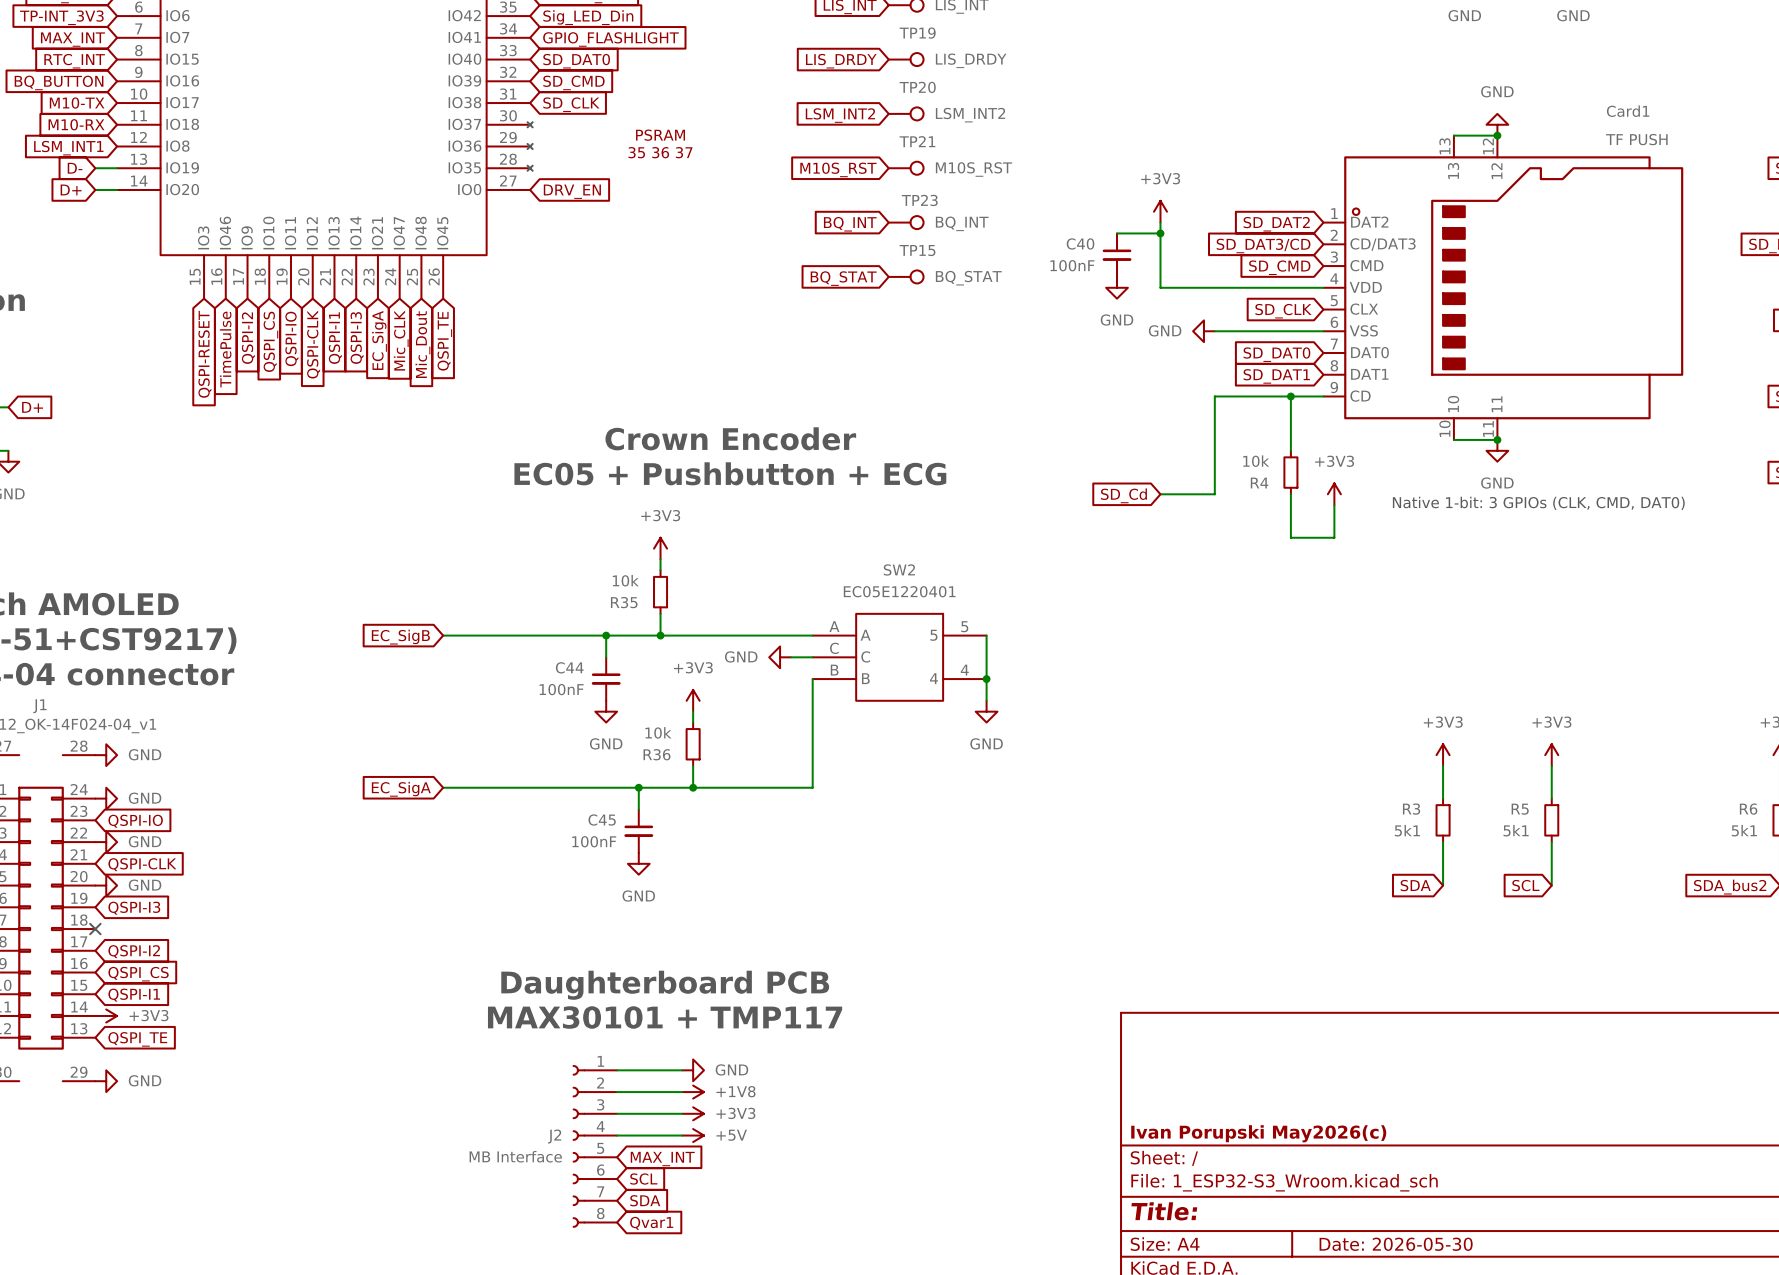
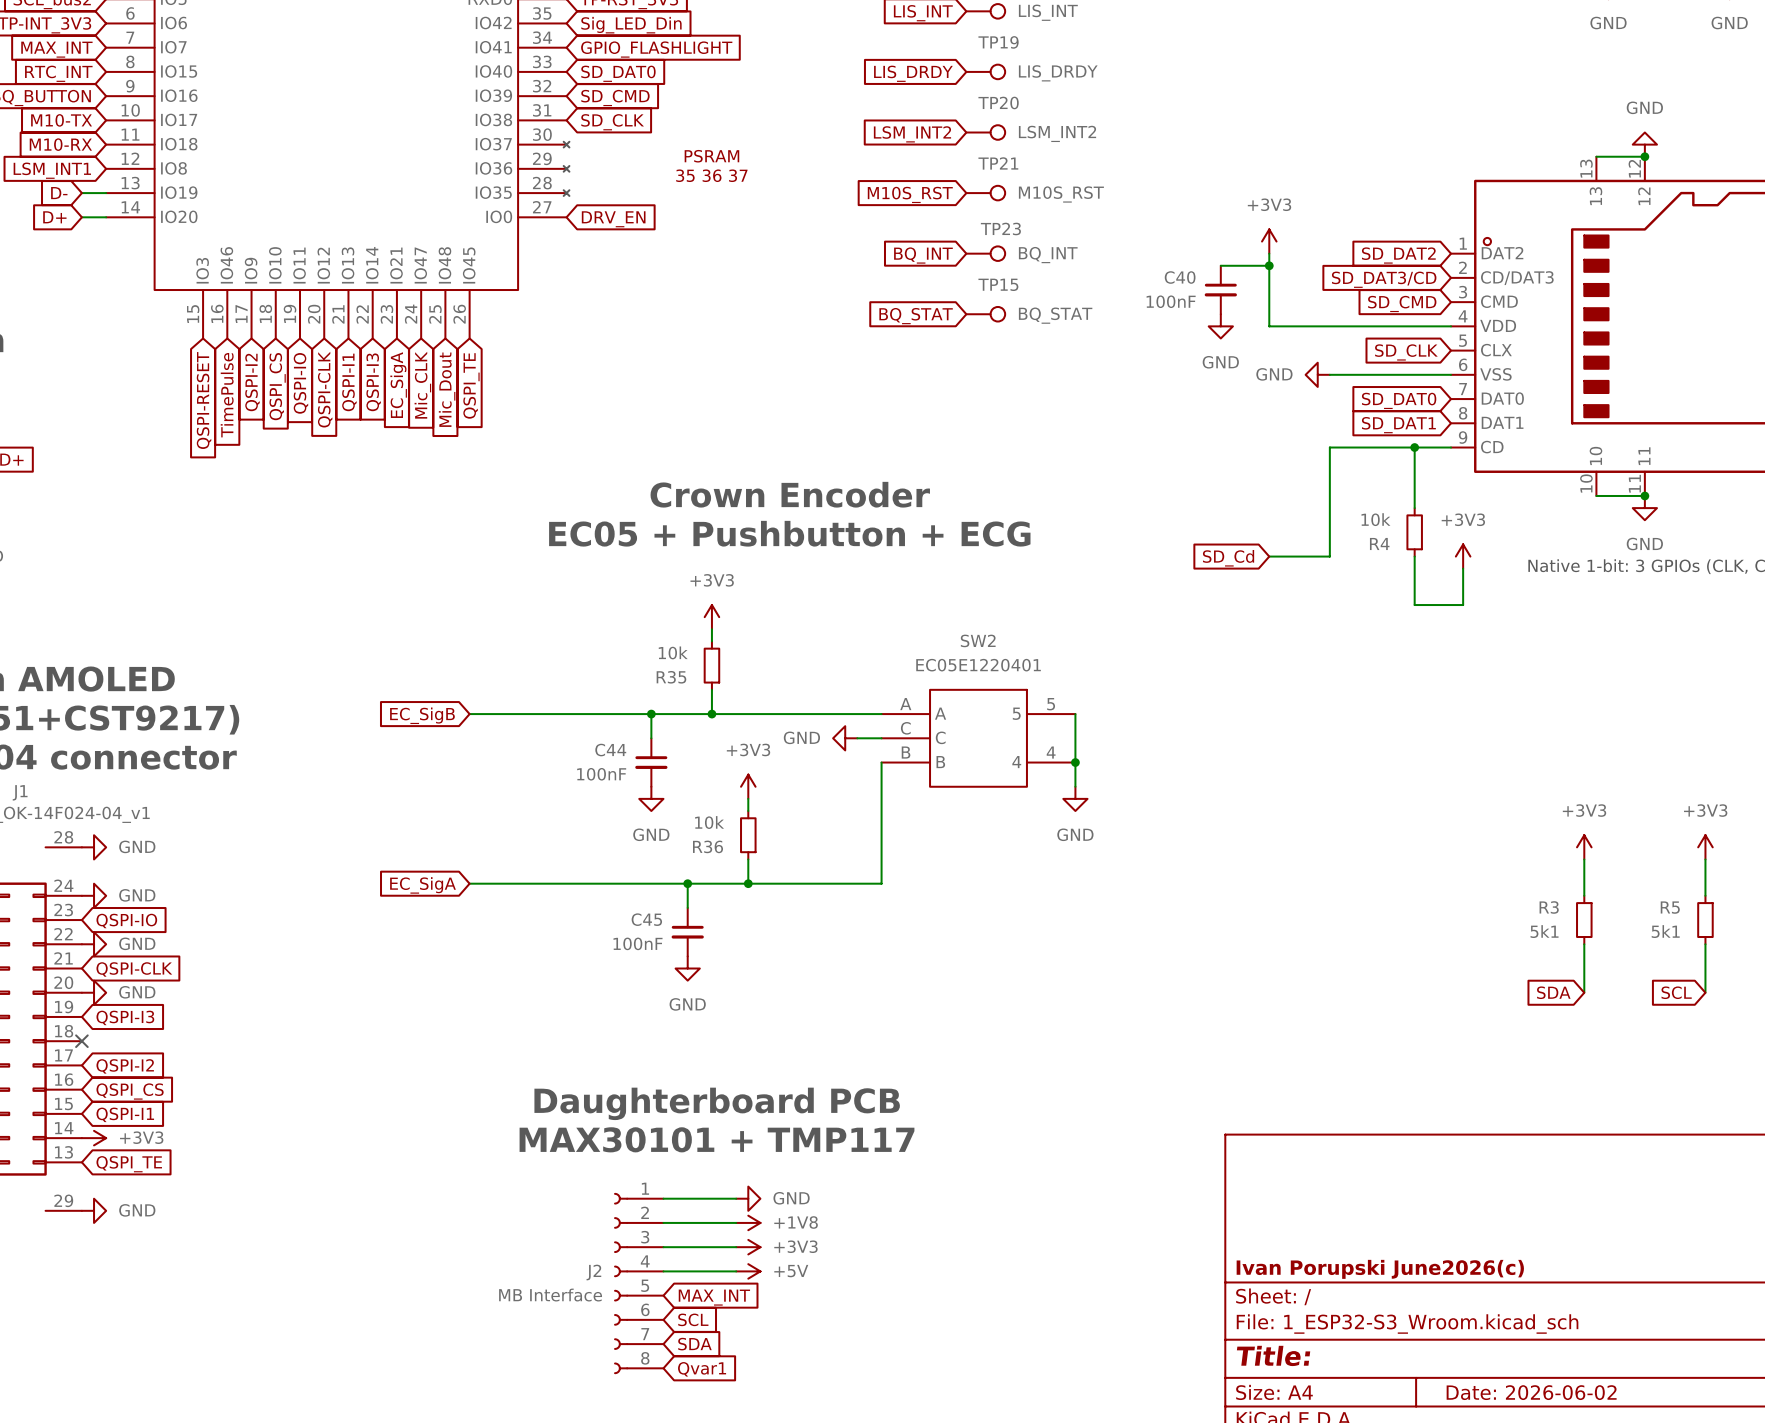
title block: Ivan Porupski May2026(c) (1258, 1133) -> Ivan Porupski June2026(c) (1380, 1269)
title block: Date: 2026-05-30 (1396, 1244) -> Date: 2026-06-02 (1531, 1392)

